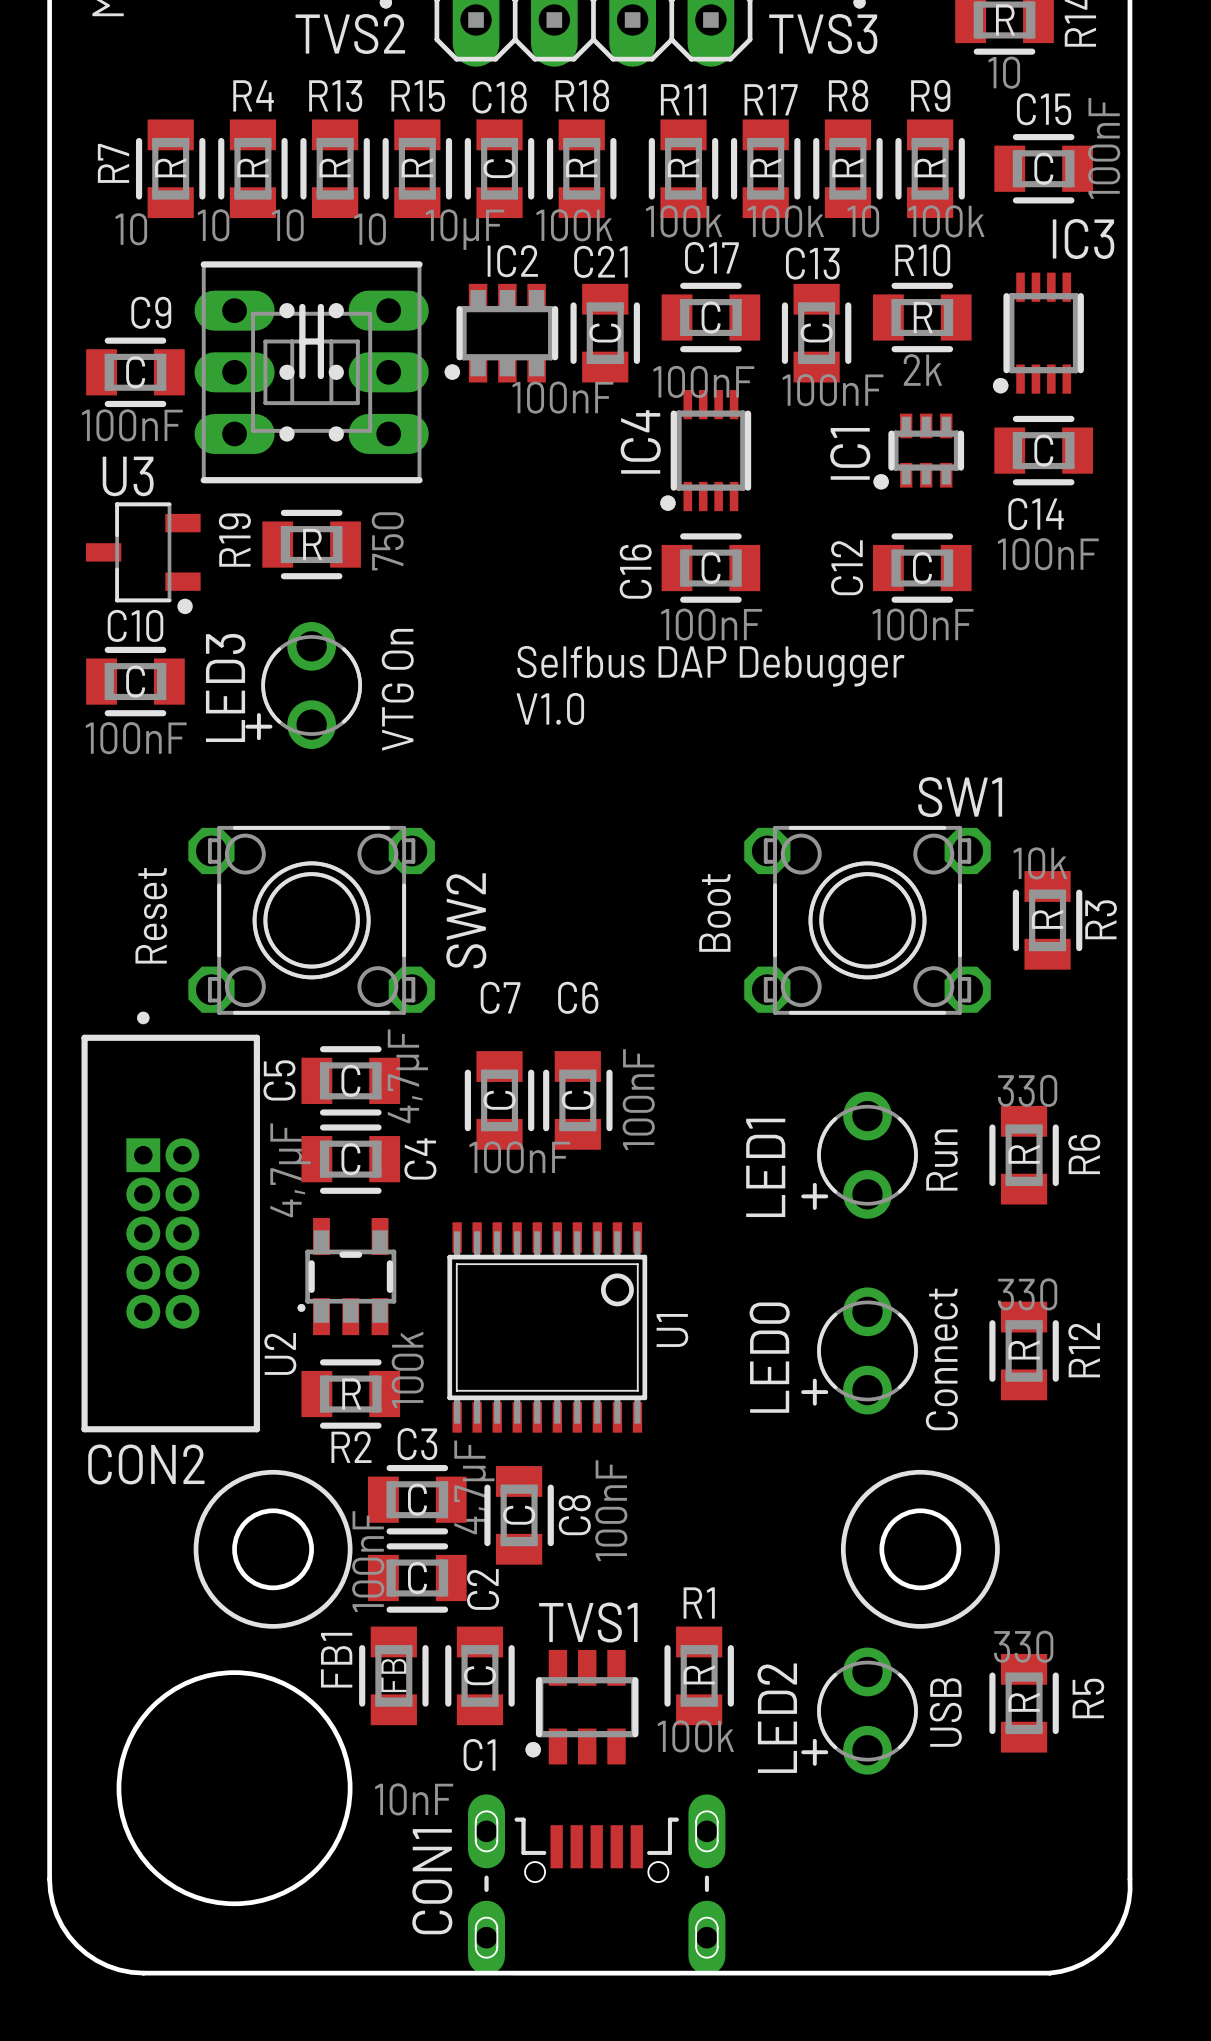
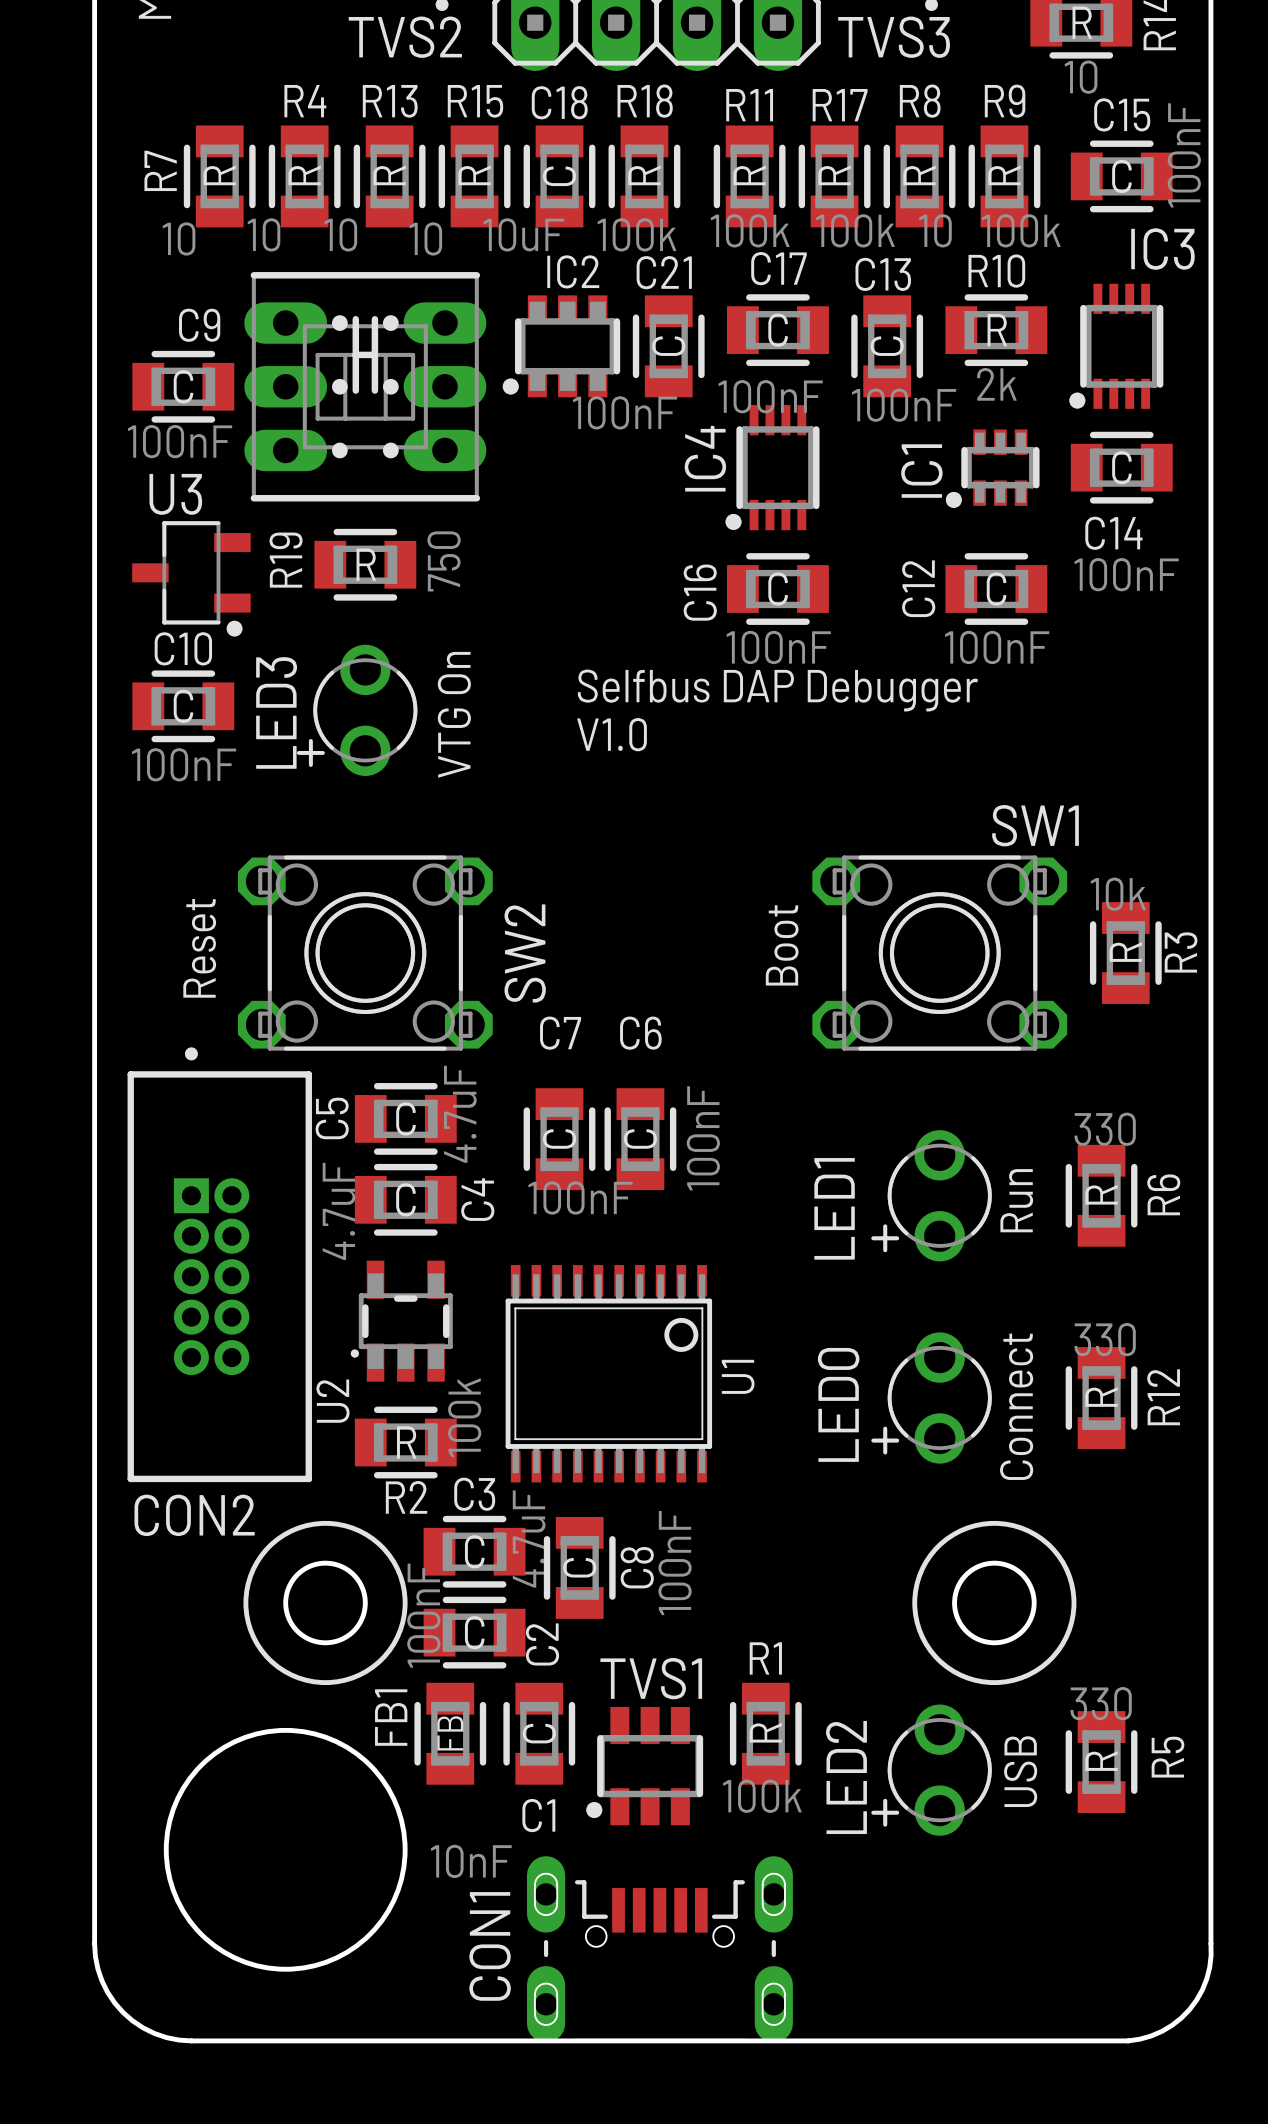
C18 value: 10µF (465, 229) -> 10uF (523, 234)
C5 value: 4,7µF (407, 1076) -> 4.7uF (460, 1114)
C4 value: 4,7µF (290, 1170) -> 4.7uF (339, 1211)
C3 value: 4,7µF (474, 1487) -> 4.7uF (529, 1539)

